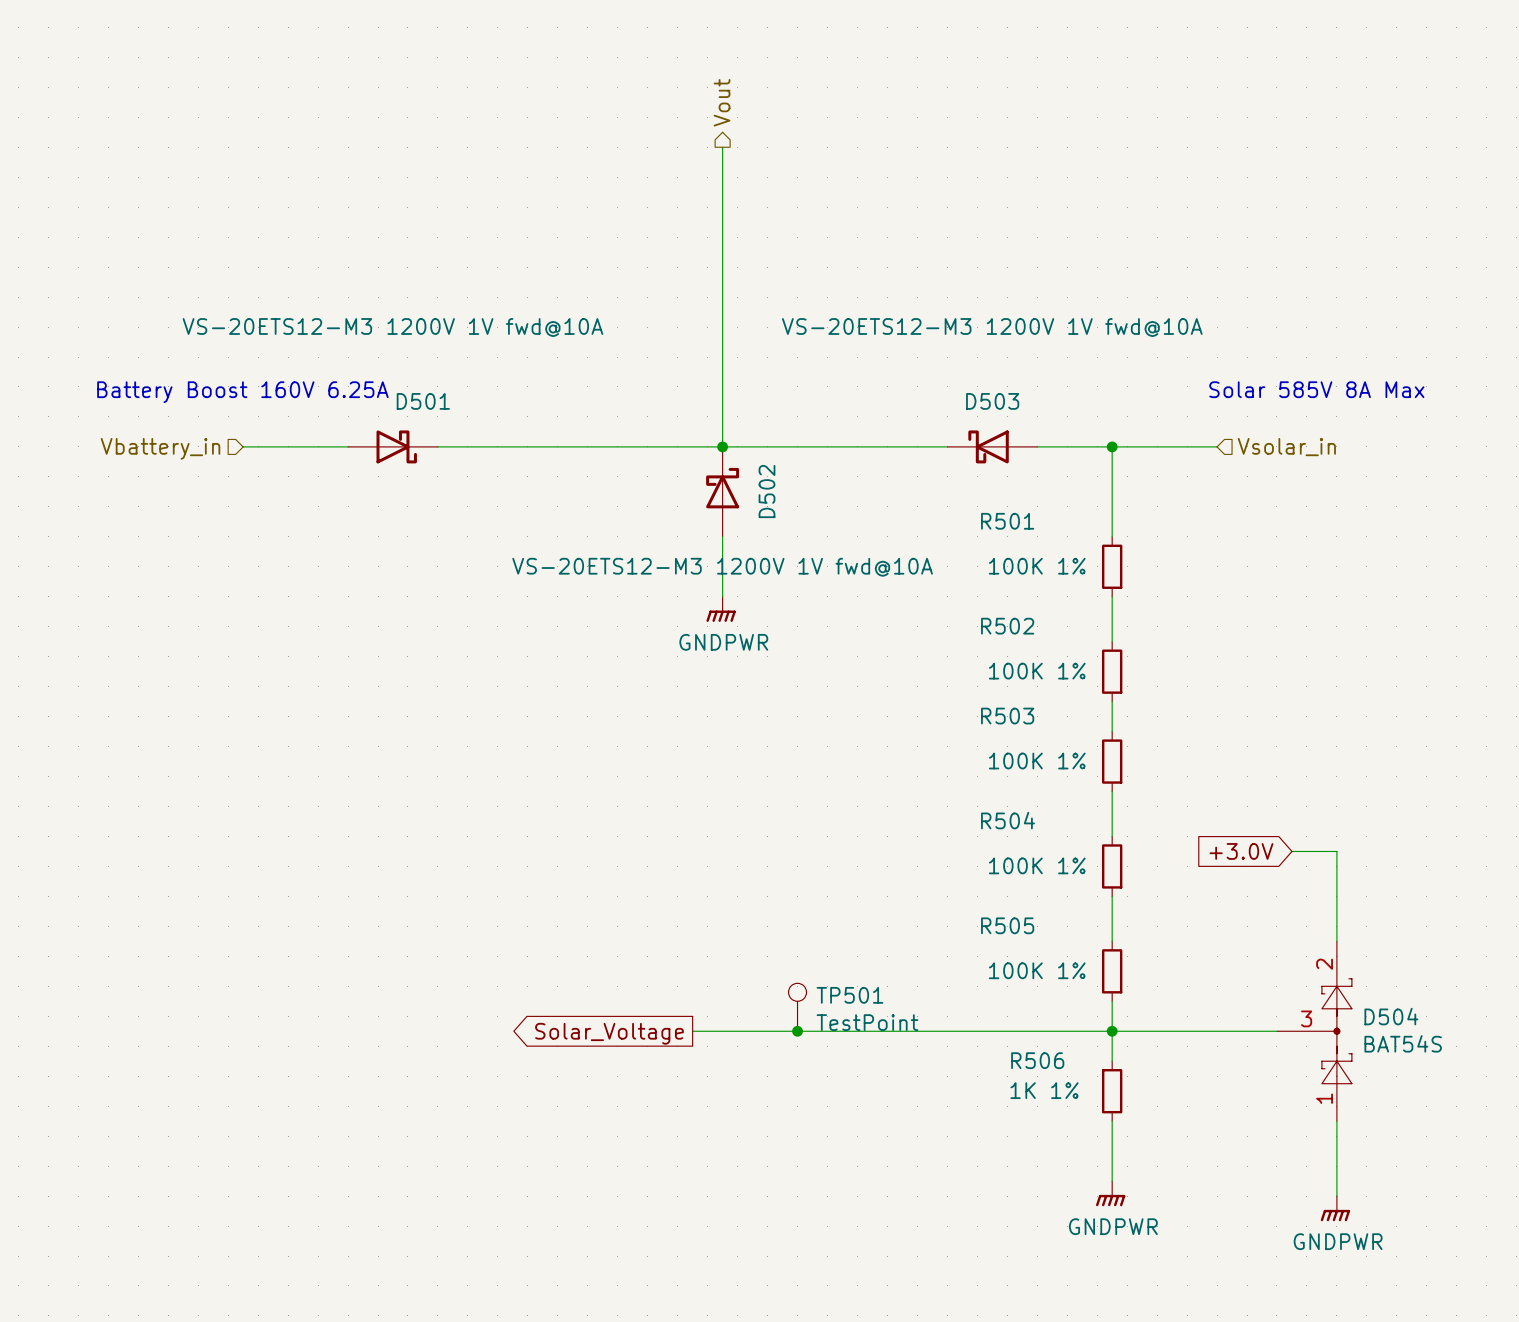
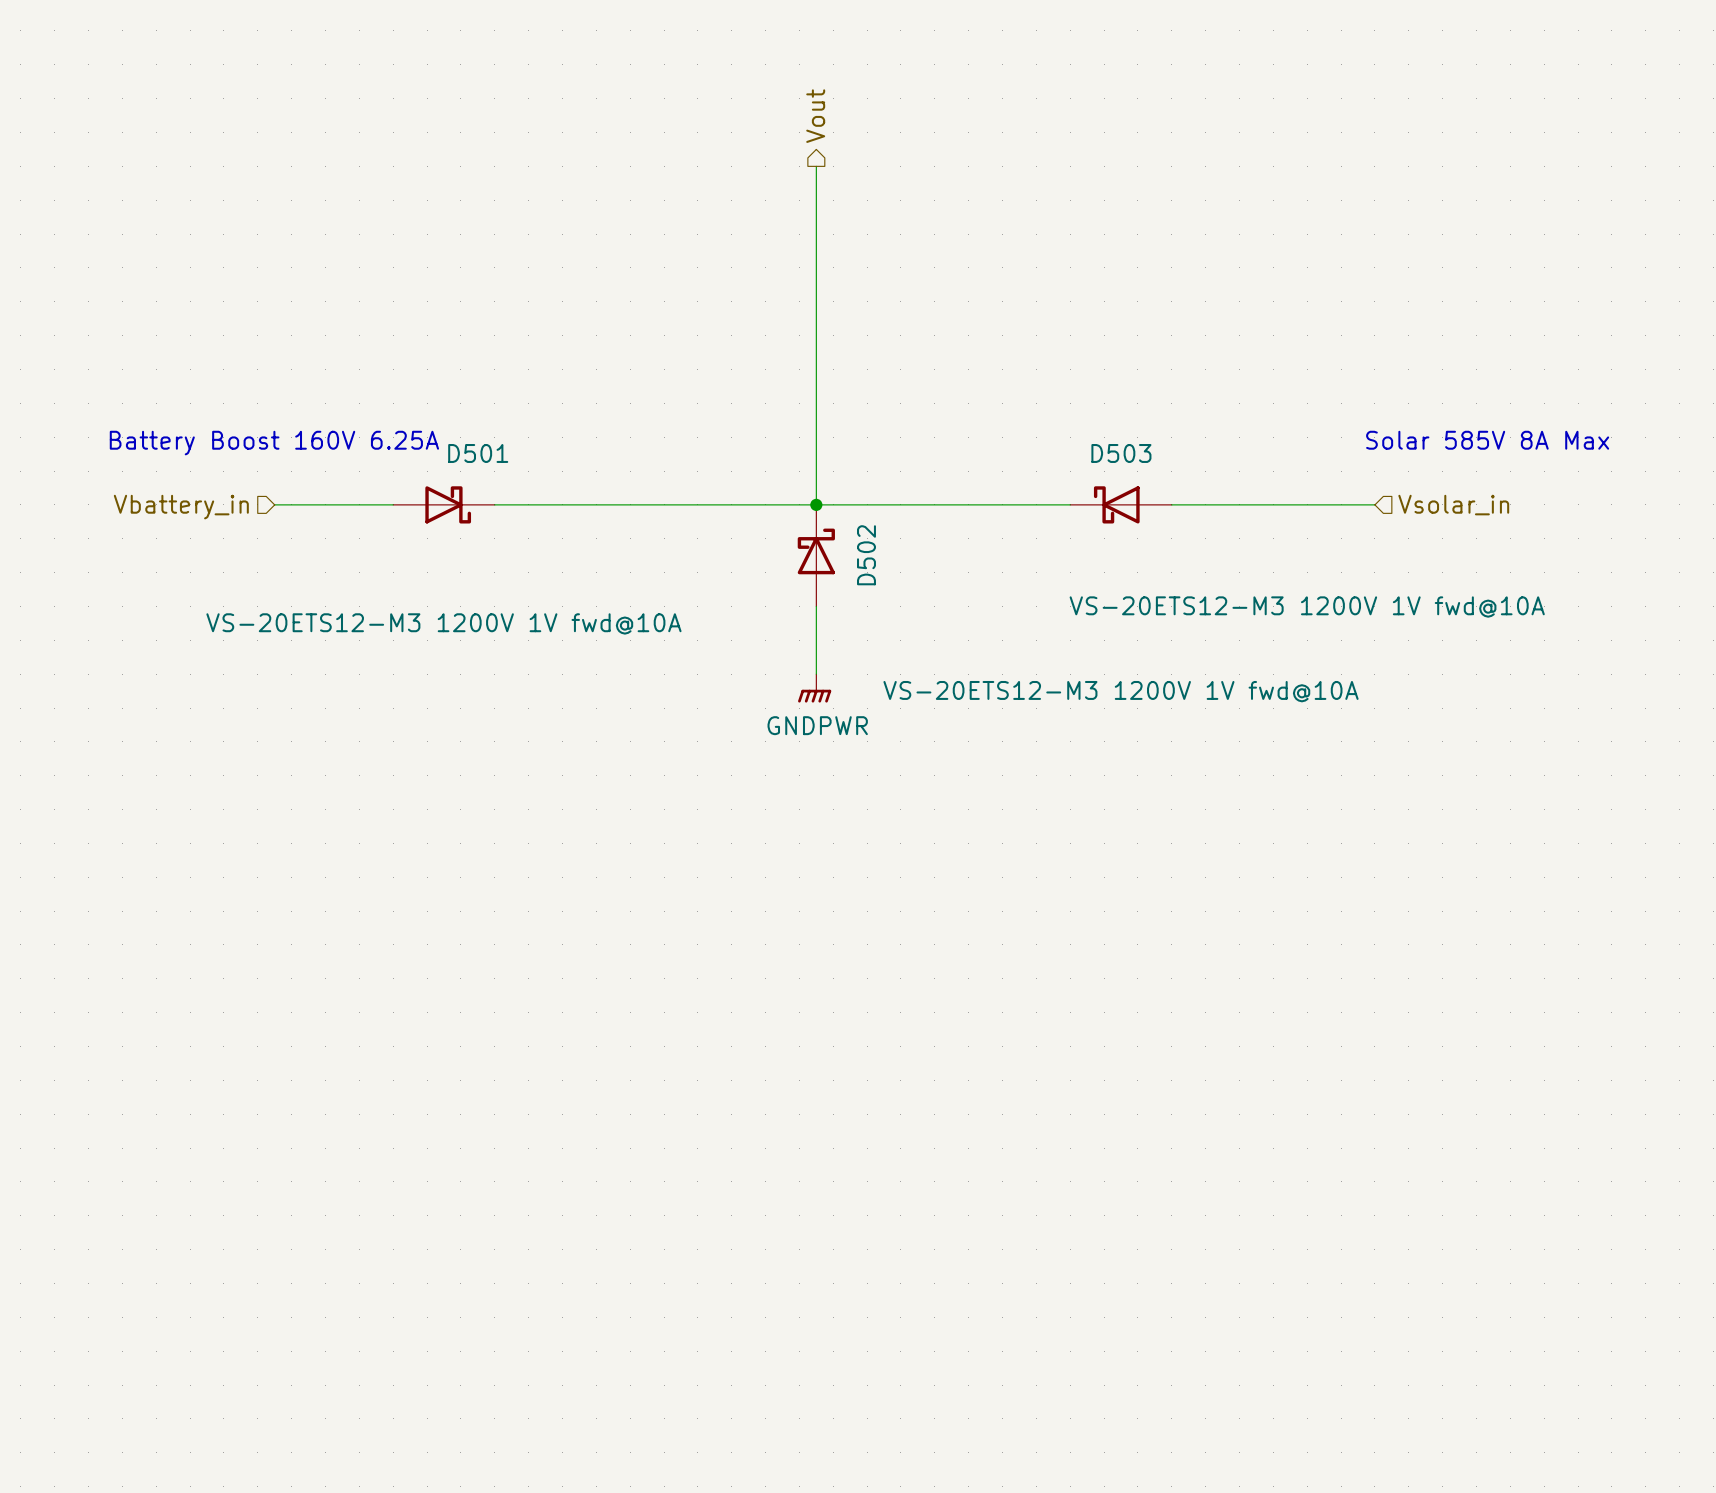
D501 value position: VS-20ETS12-M3 1200V 1V fwd@10A (392, 327) -> VS-20ETS12-M3 1200V 1V fwd@10A (443, 623)
D503 value position: VS-20ETS12-M3 1200V 1V fwd@10A (992, 327) -> VS-20ETS12-M3 1200V 1V fwd@10A (1307, 607)
wire: (1112, 446) (1112, 536) -> none
junction: (1112, 446) -> none
R501: 100K 1% (1112, 566) -> none
D502 value position: VS-20ETS12-M3 1200V 1V fwd@10A (722, 567) -> VS-20ETS12-M3 1200V 1V fwd@10A (1121, 691)
wire: (1112, 596) (1112, 641) -> none
R502: 100K 1% (1112, 671) -> none
wire: (1112, 701) (1112, 731) -> none
R503: 100K 1% (1112, 761) -> none
wire: (1112, 791) (1112, 836) -> none
global label: +3.0V (1241, 851) -> none
wire: (1291, 851) (1336, 851) (1336, 941) -> none
R504: 100K 1% (1112, 866) -> none
wire: (1112, 896) (1112, 941) -> none
R505: 100K 1% (1112, 971) -> none
wire: (1112, 1001) (1112, 1061) -> none
TP501: TestPoint (797, 1007) -> none
wire: (692, 1031) (1276, 1031) -> none
junction: (797, 1031) -> none
junction: (1112, 1031) -> none
D504: BAT54S (1314, 1031) -> none
global label: Solar_Voltage (609, 1033) -> none
R506: 1K 1% (1112, 1091) -> none
wire: (1112, 1121) (1112, 1181) -> none
wire: (1336, 1121) (1336, 1196) -> none
power symbol: GNDPWR (1110, 1193) -> none
power symbol: GNDPWR (1335, 1208) -> none

